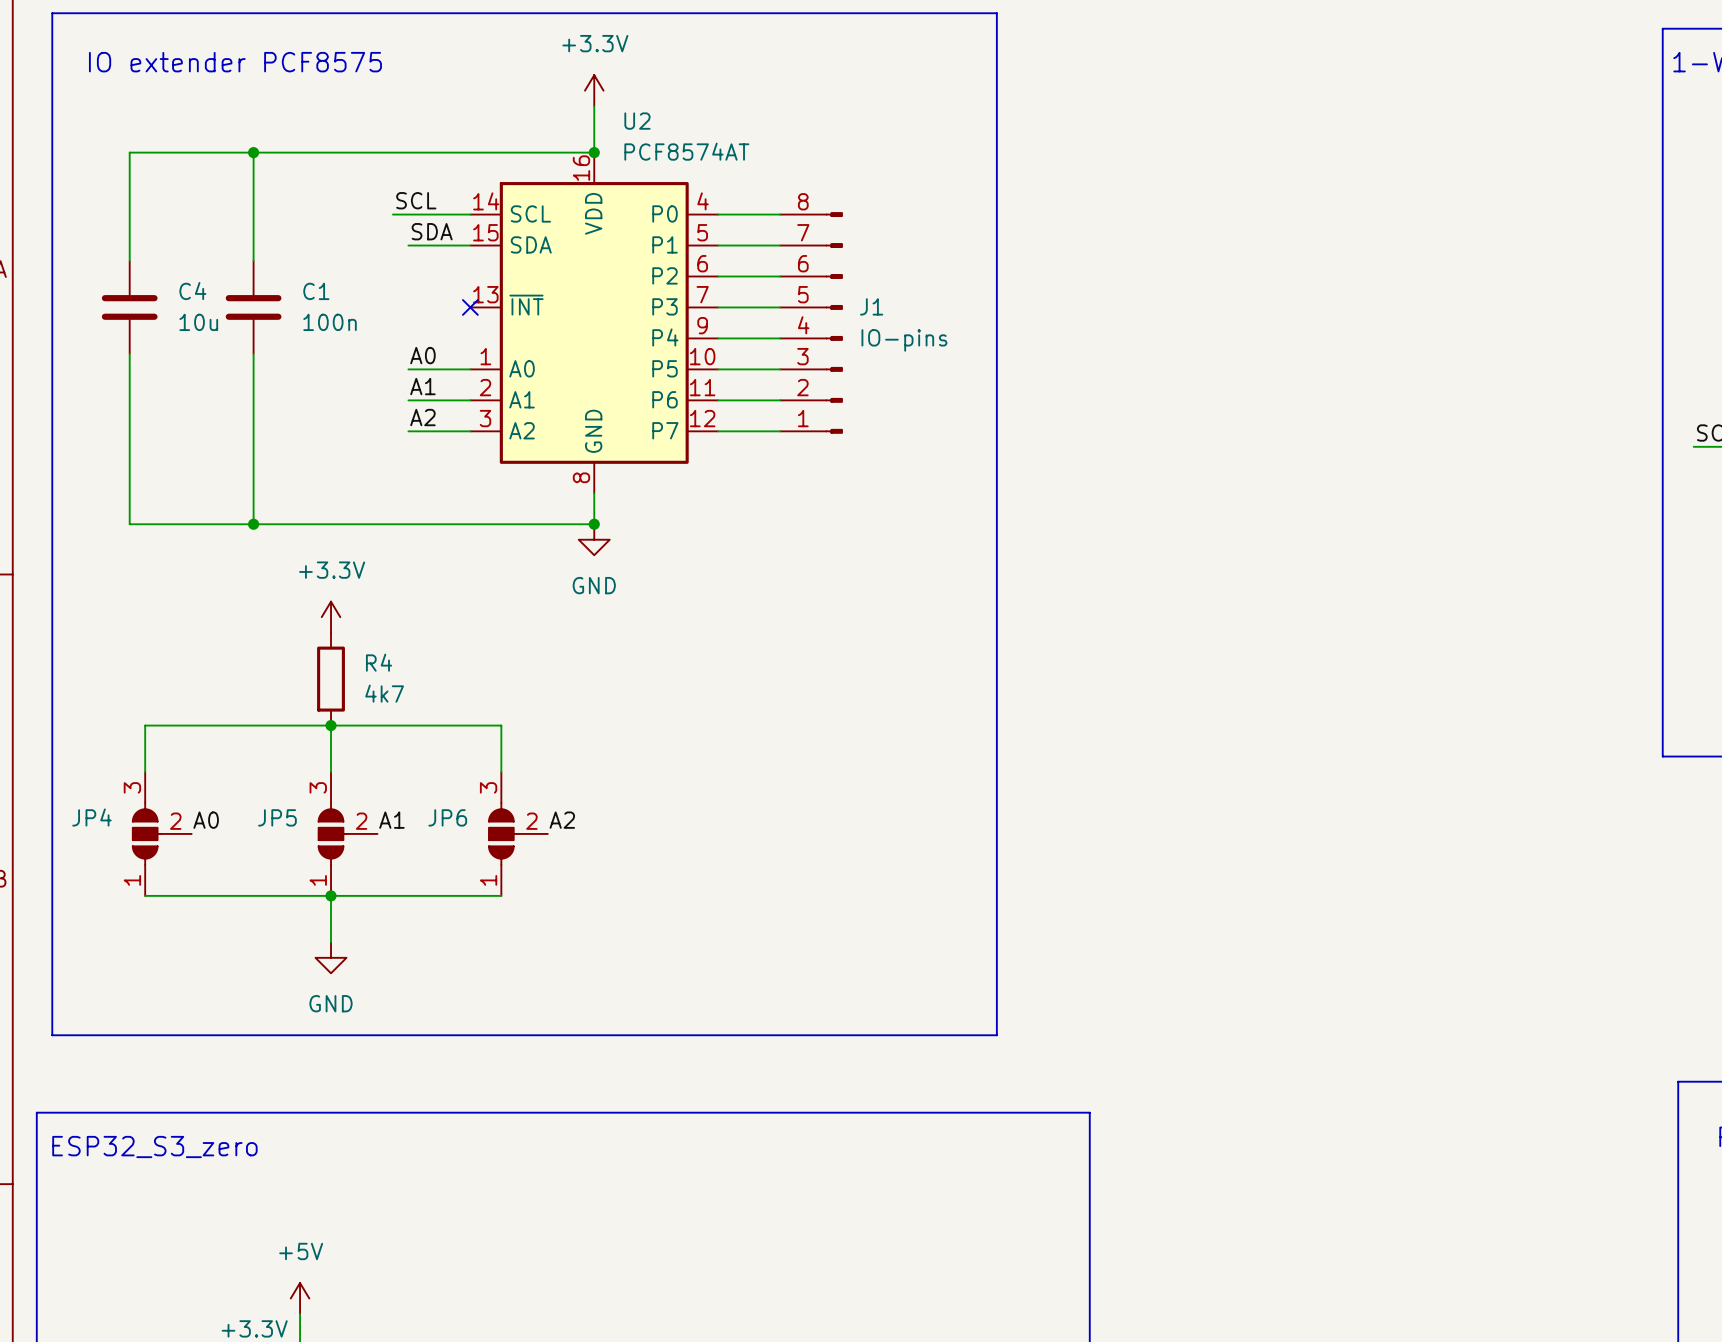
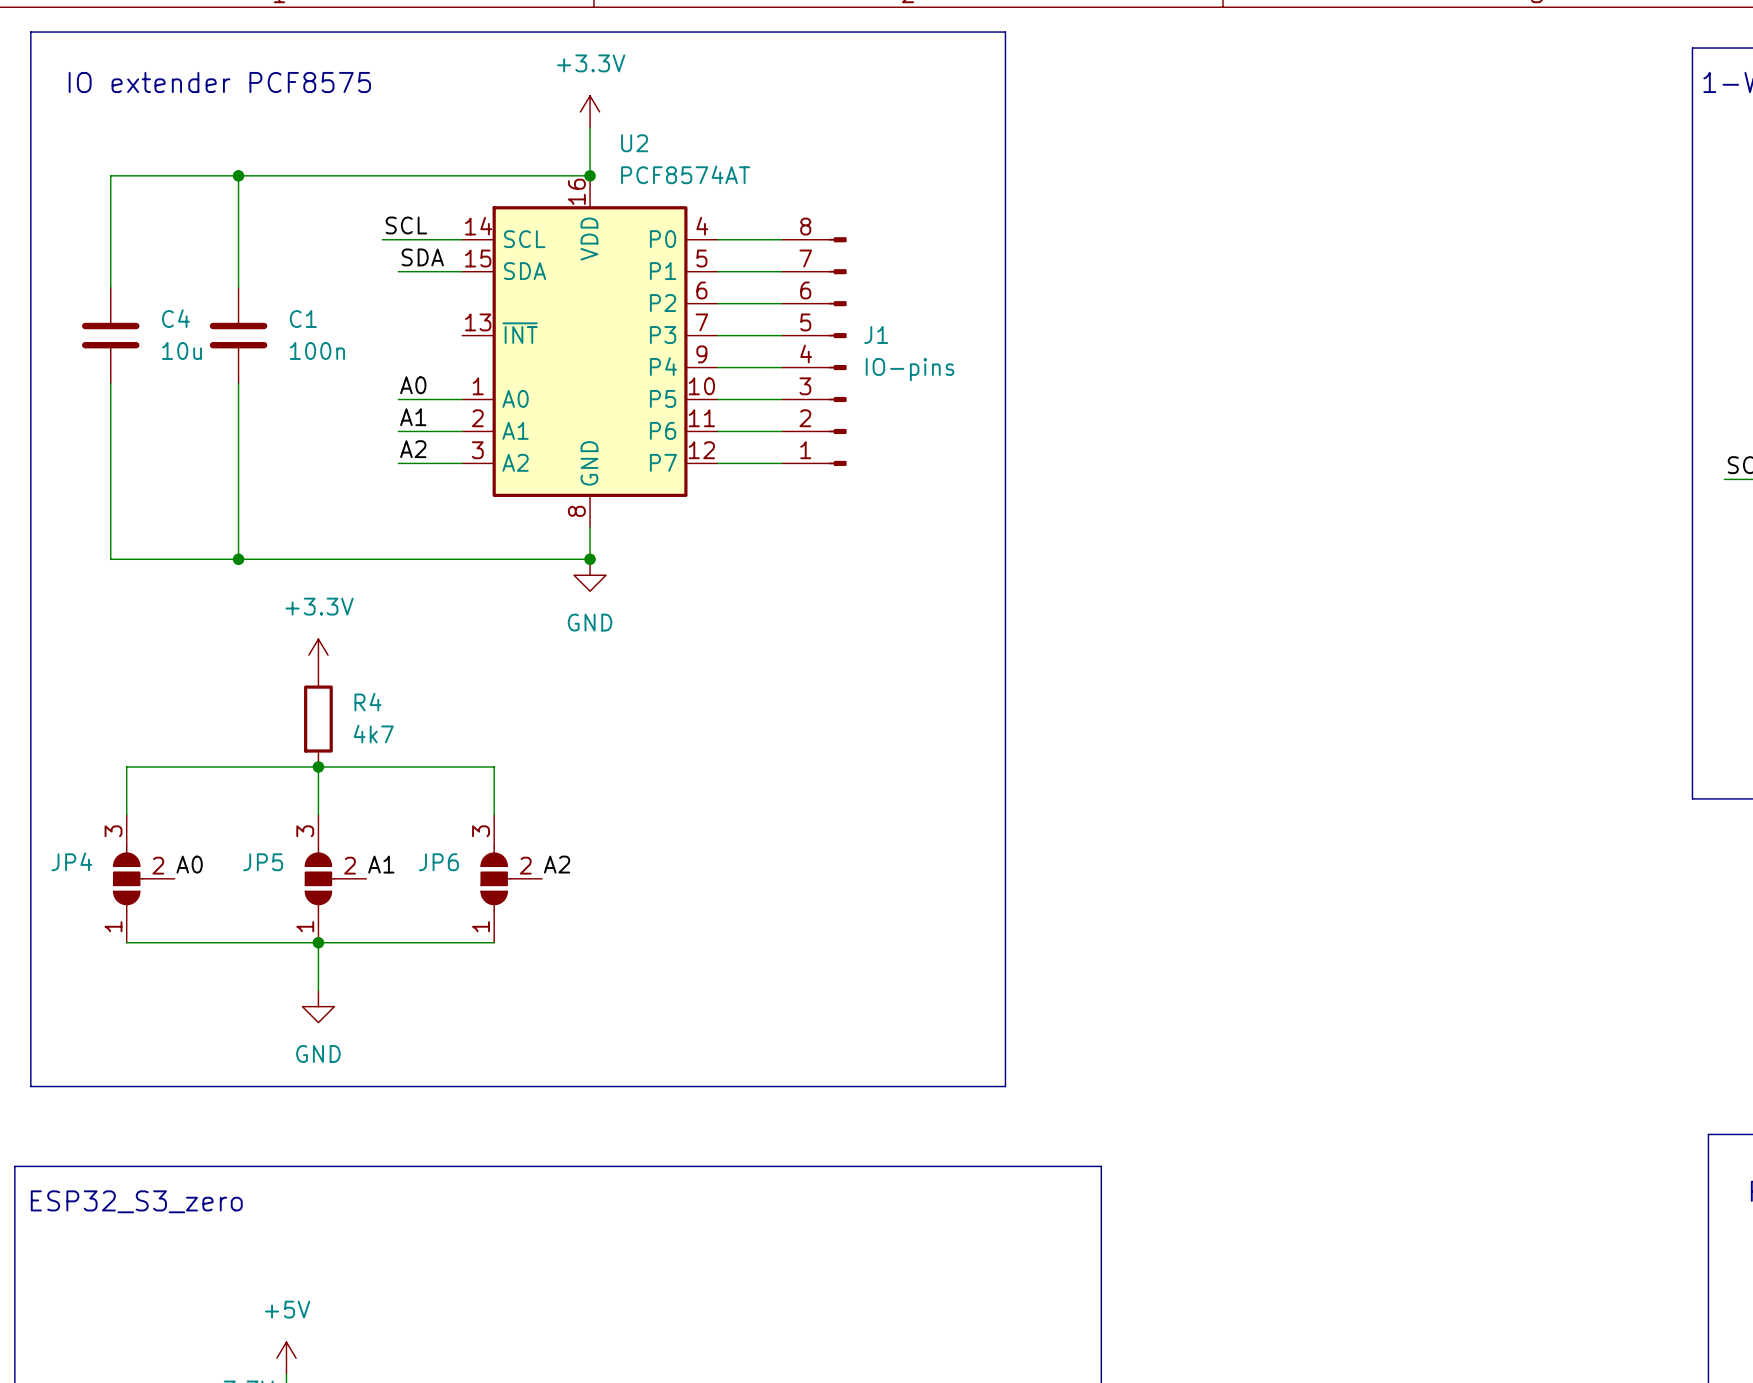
no-connect mark: (470, 307) -> none

